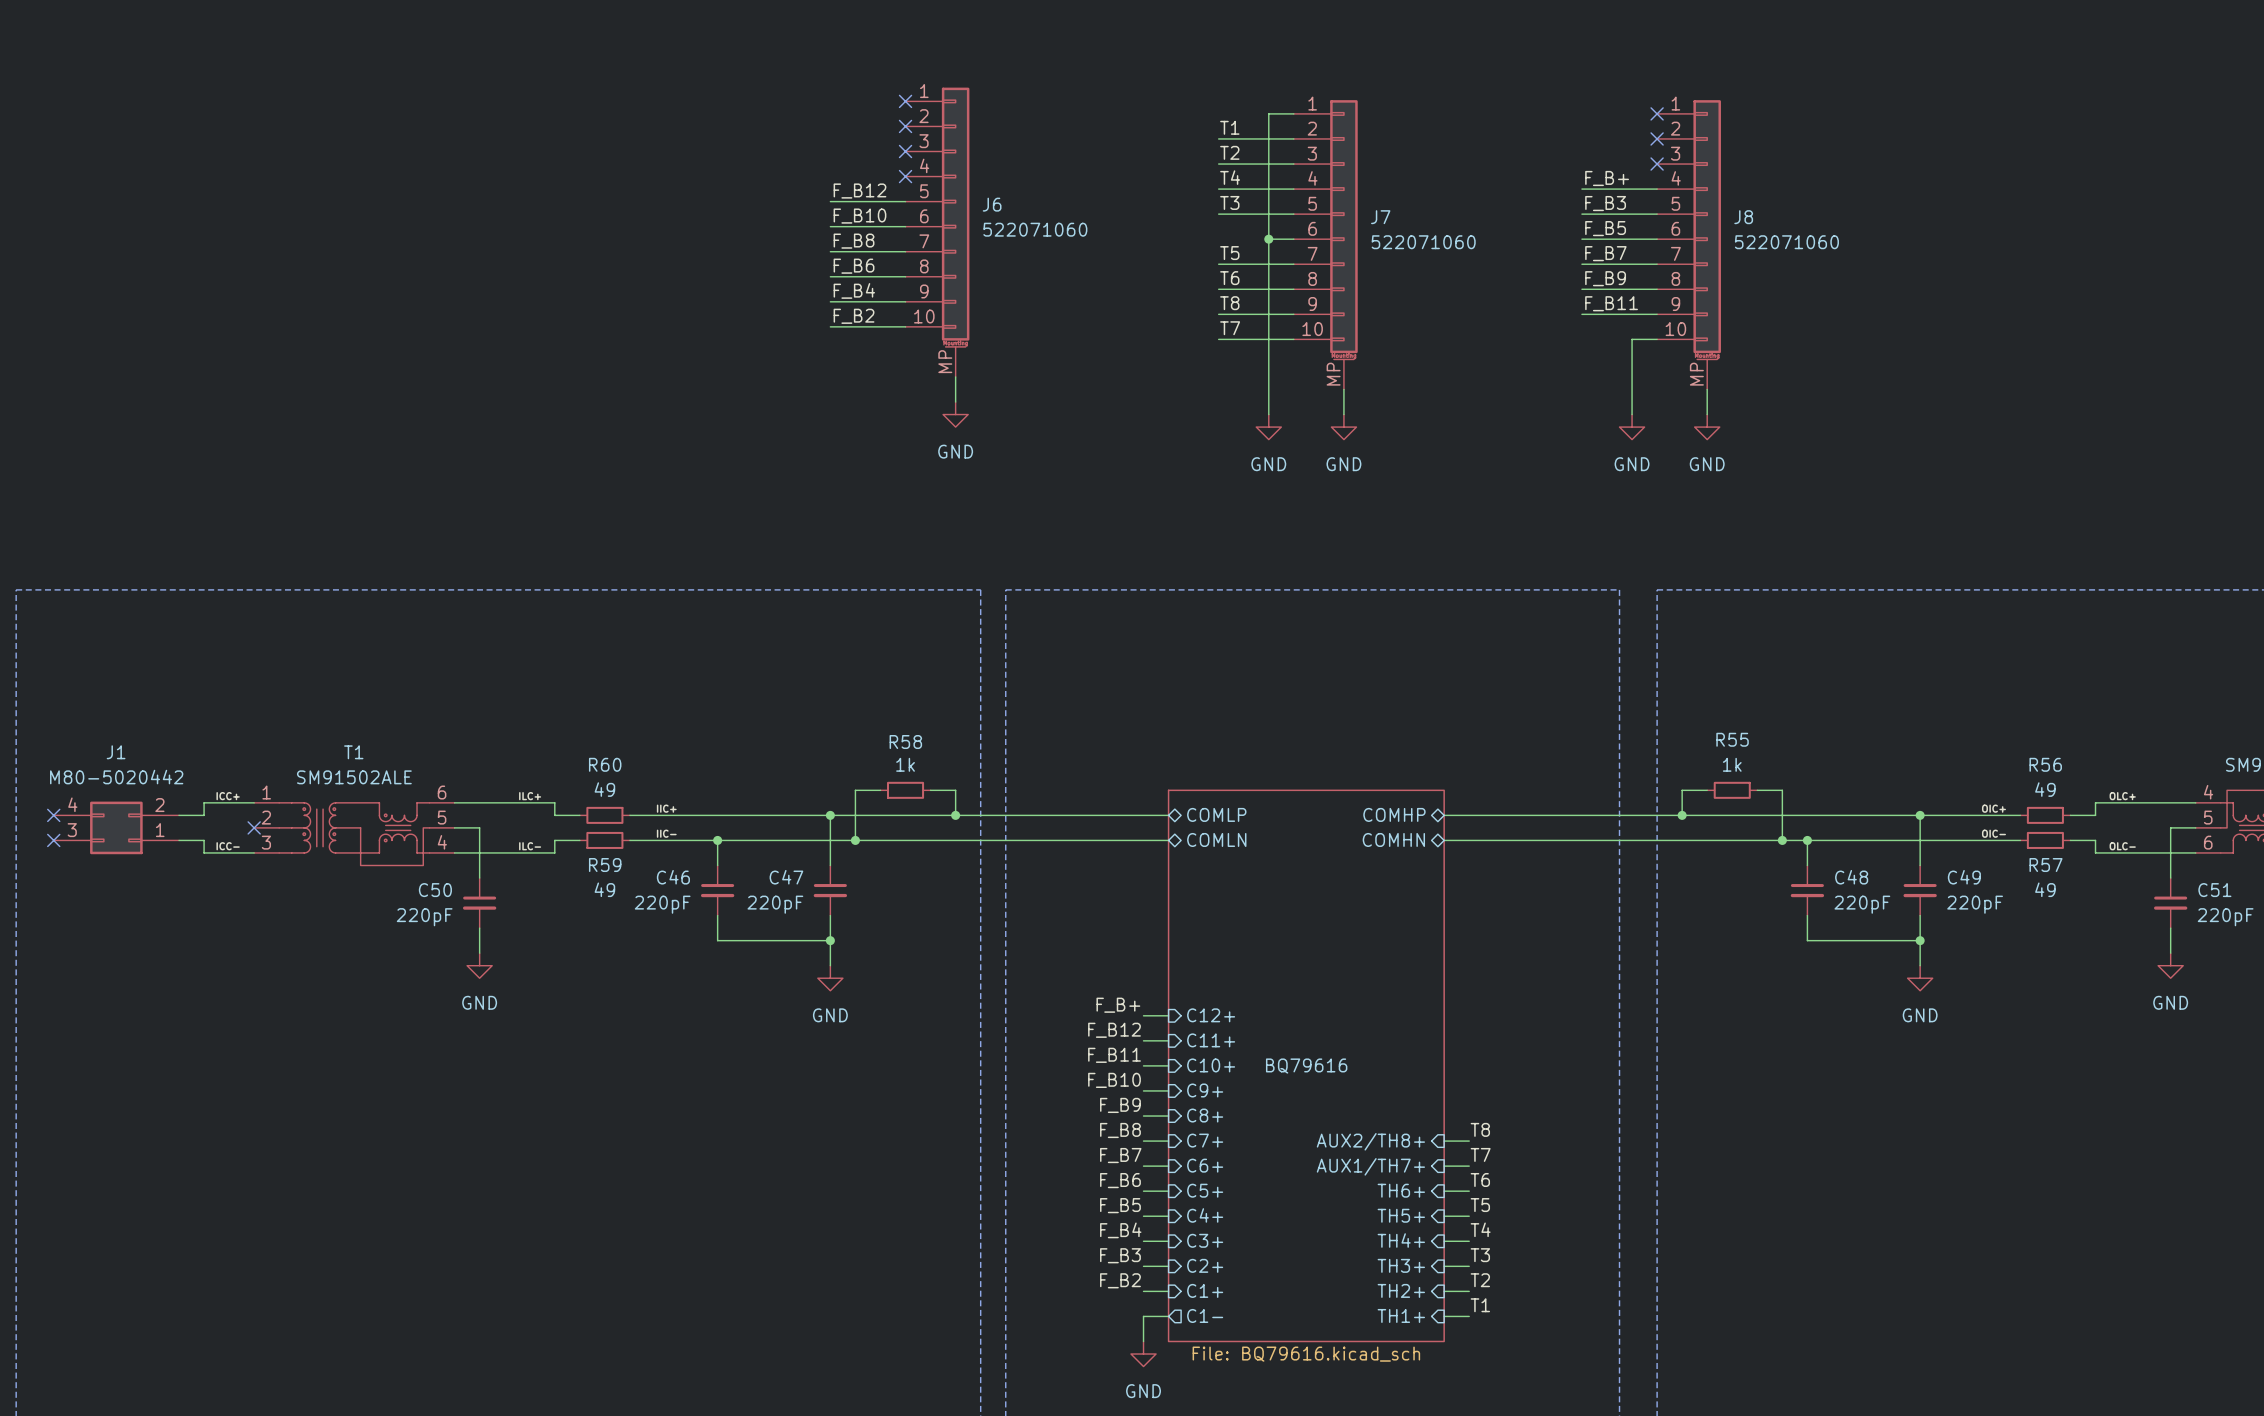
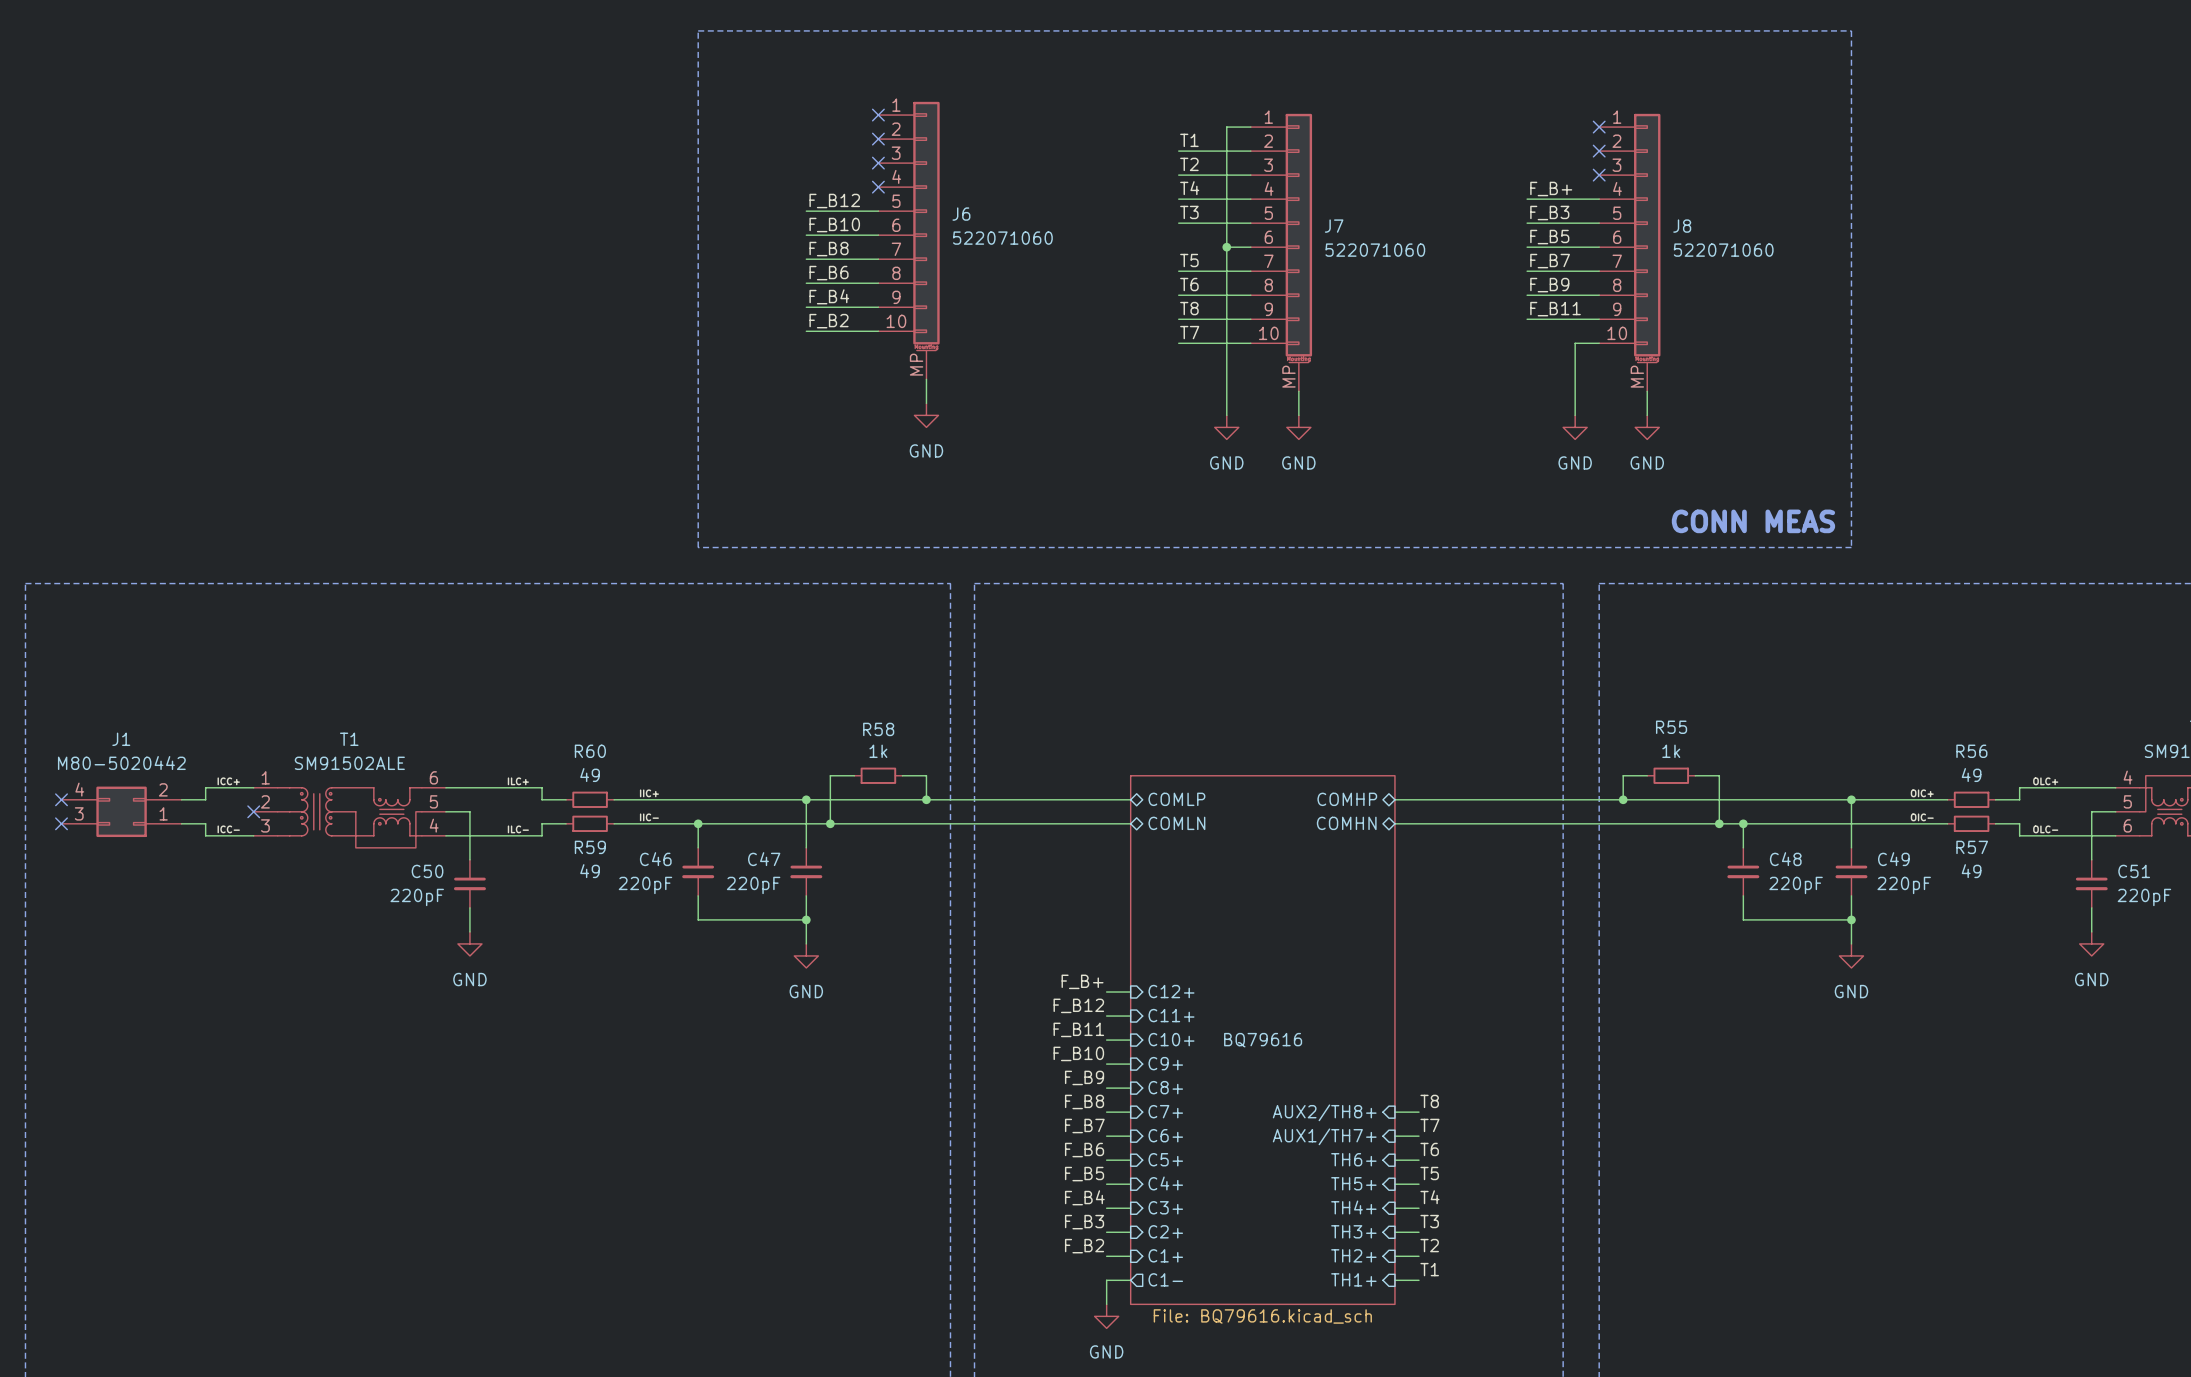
line: none -> (698, 30) (1851, 30) (1851, 547) (698, 547) (698, 30)
text: none -> CONN MEAS (1753, 521)

